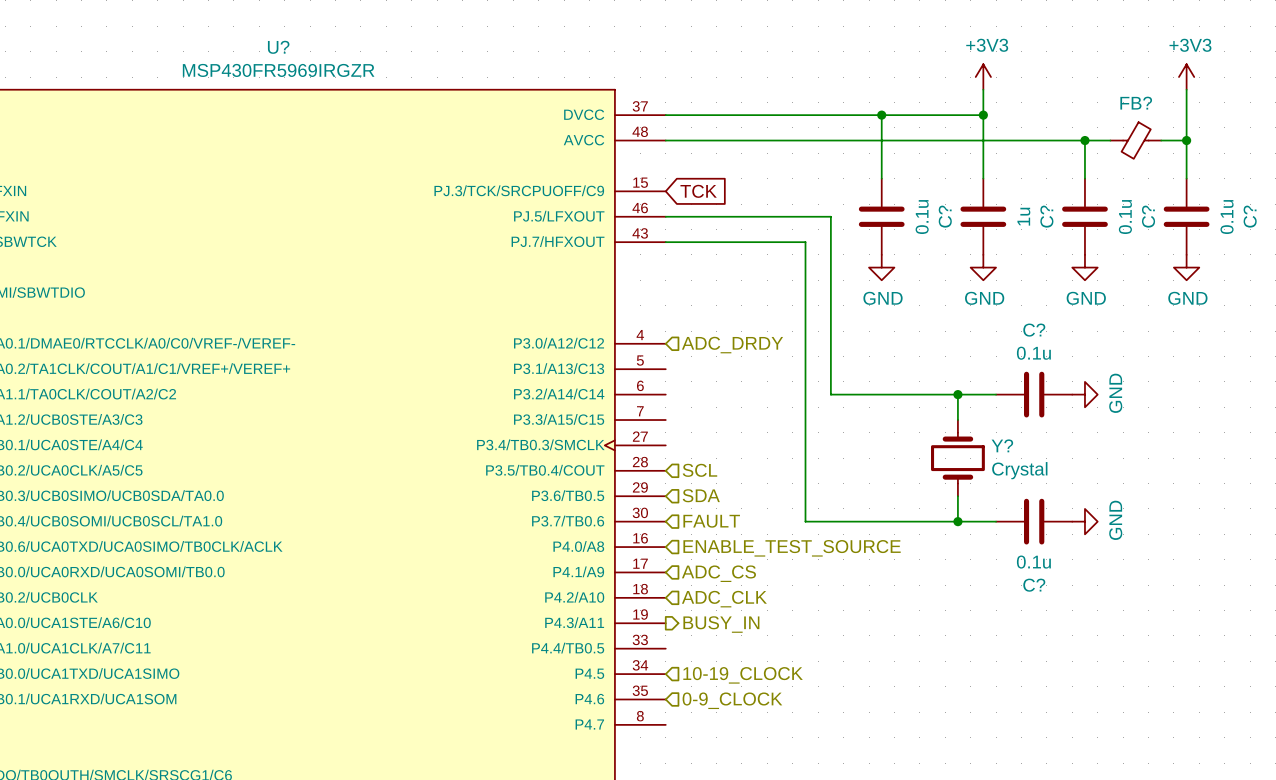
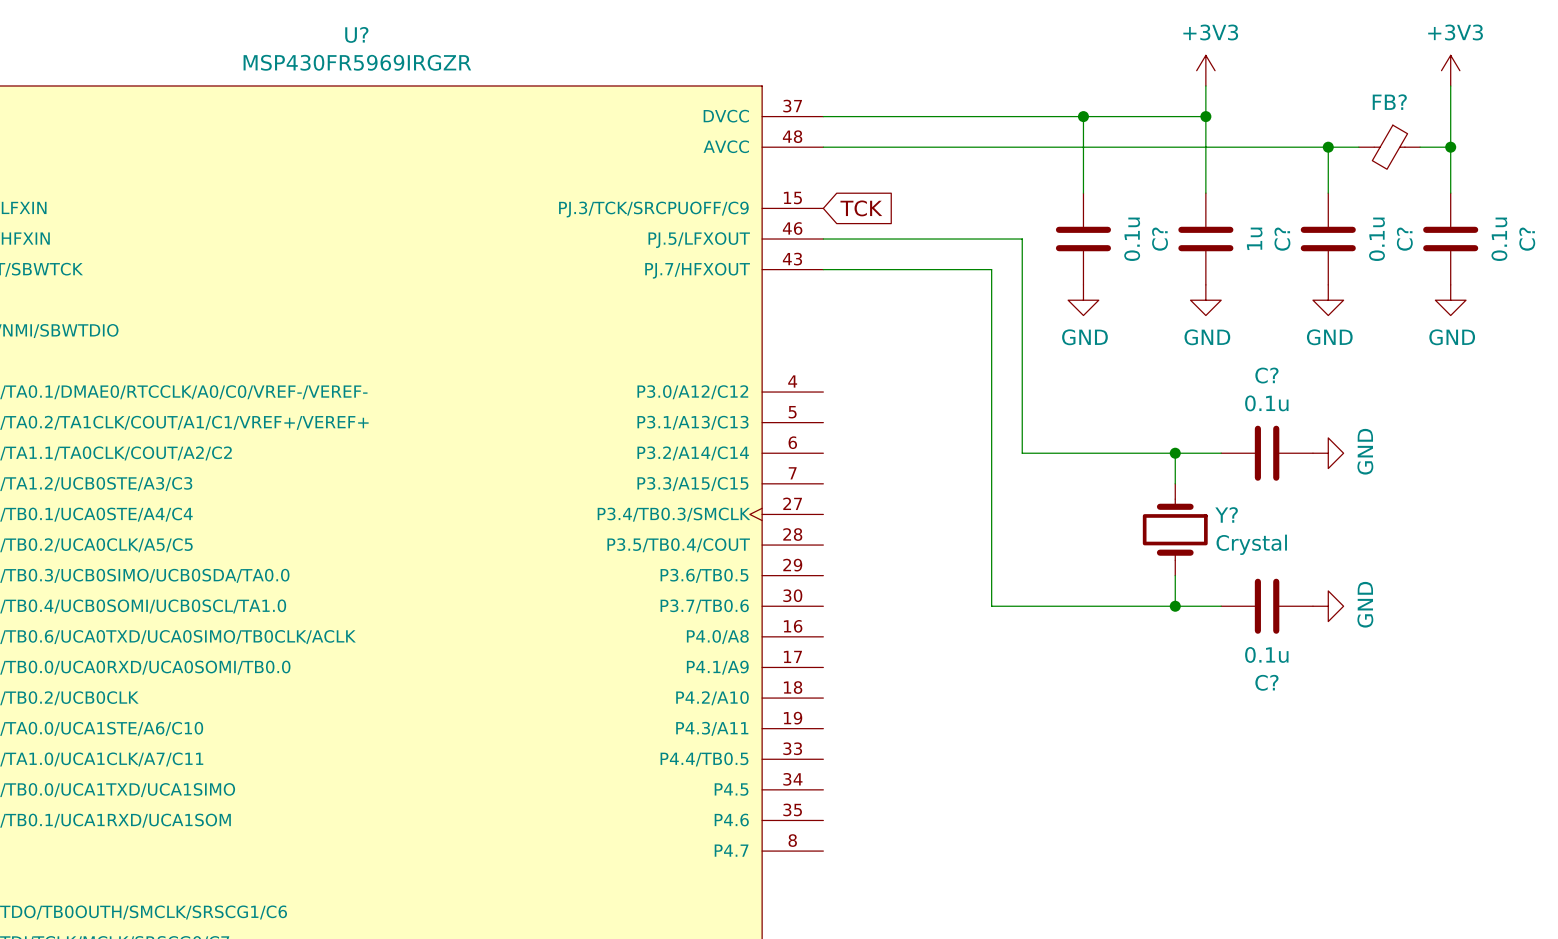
hierarchical label: ADC_DRDY (732, 345) -> none
hierarchical label: SCL (699, 470) -> none
hierarchical label: SDA (701, 495) -> none
hierarchical label: FAULT (711, 521) -> none
hierarchical label: ENABLE_TEST_SOURCE (792, 548) -> none
hierarchical label: ADC_CS (718, 573) -> none
hierarchical label: ADC_CLK (724, 599) -> none
hierarchical label: BUSY_IN (721, 624) -> none
hierarchical label: 10-19_CLOCK (743, 675) -> none
hierarchical label: 0-9_CLOCK (732, 700) -> none

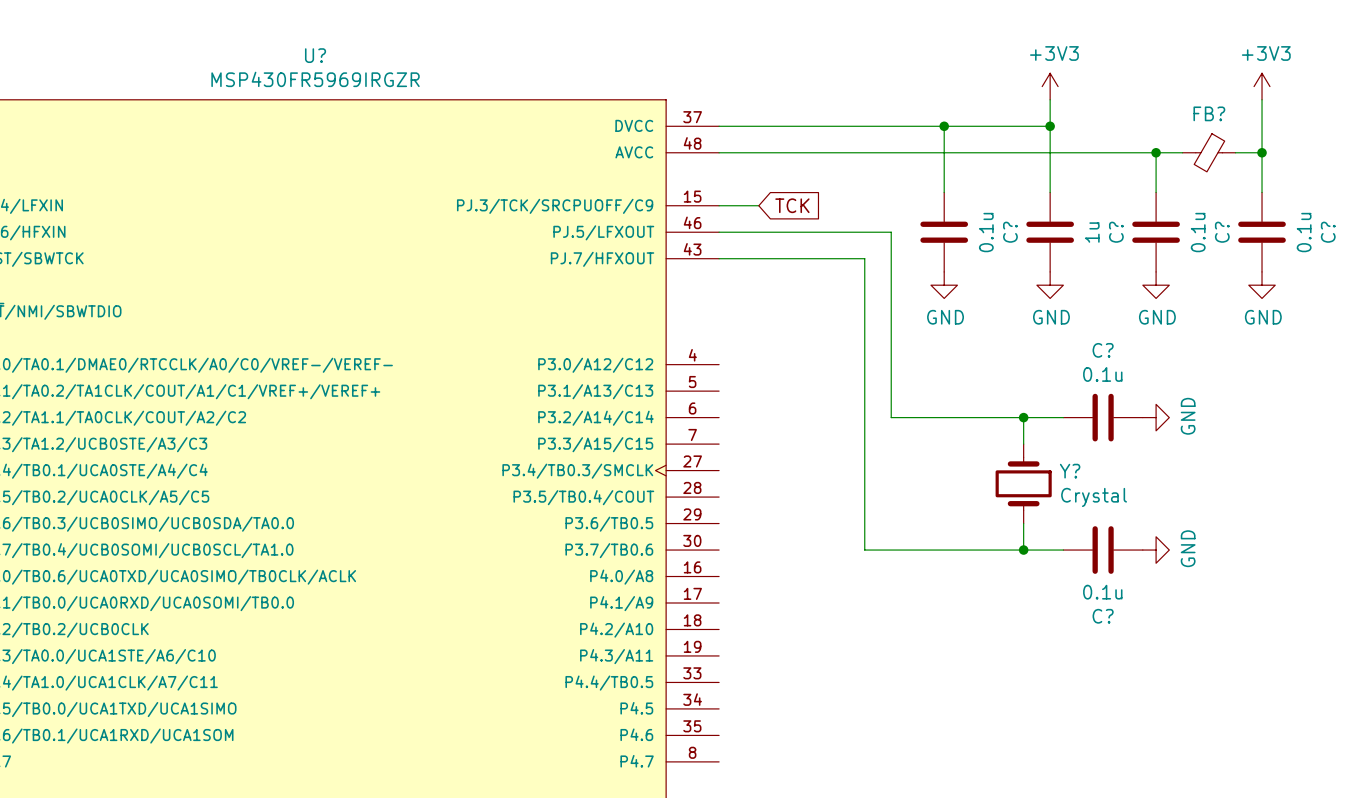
wire: none -> (719, 205) (758, 205)
global label position: TCK (861, 208) -> TCK (792, 205)

